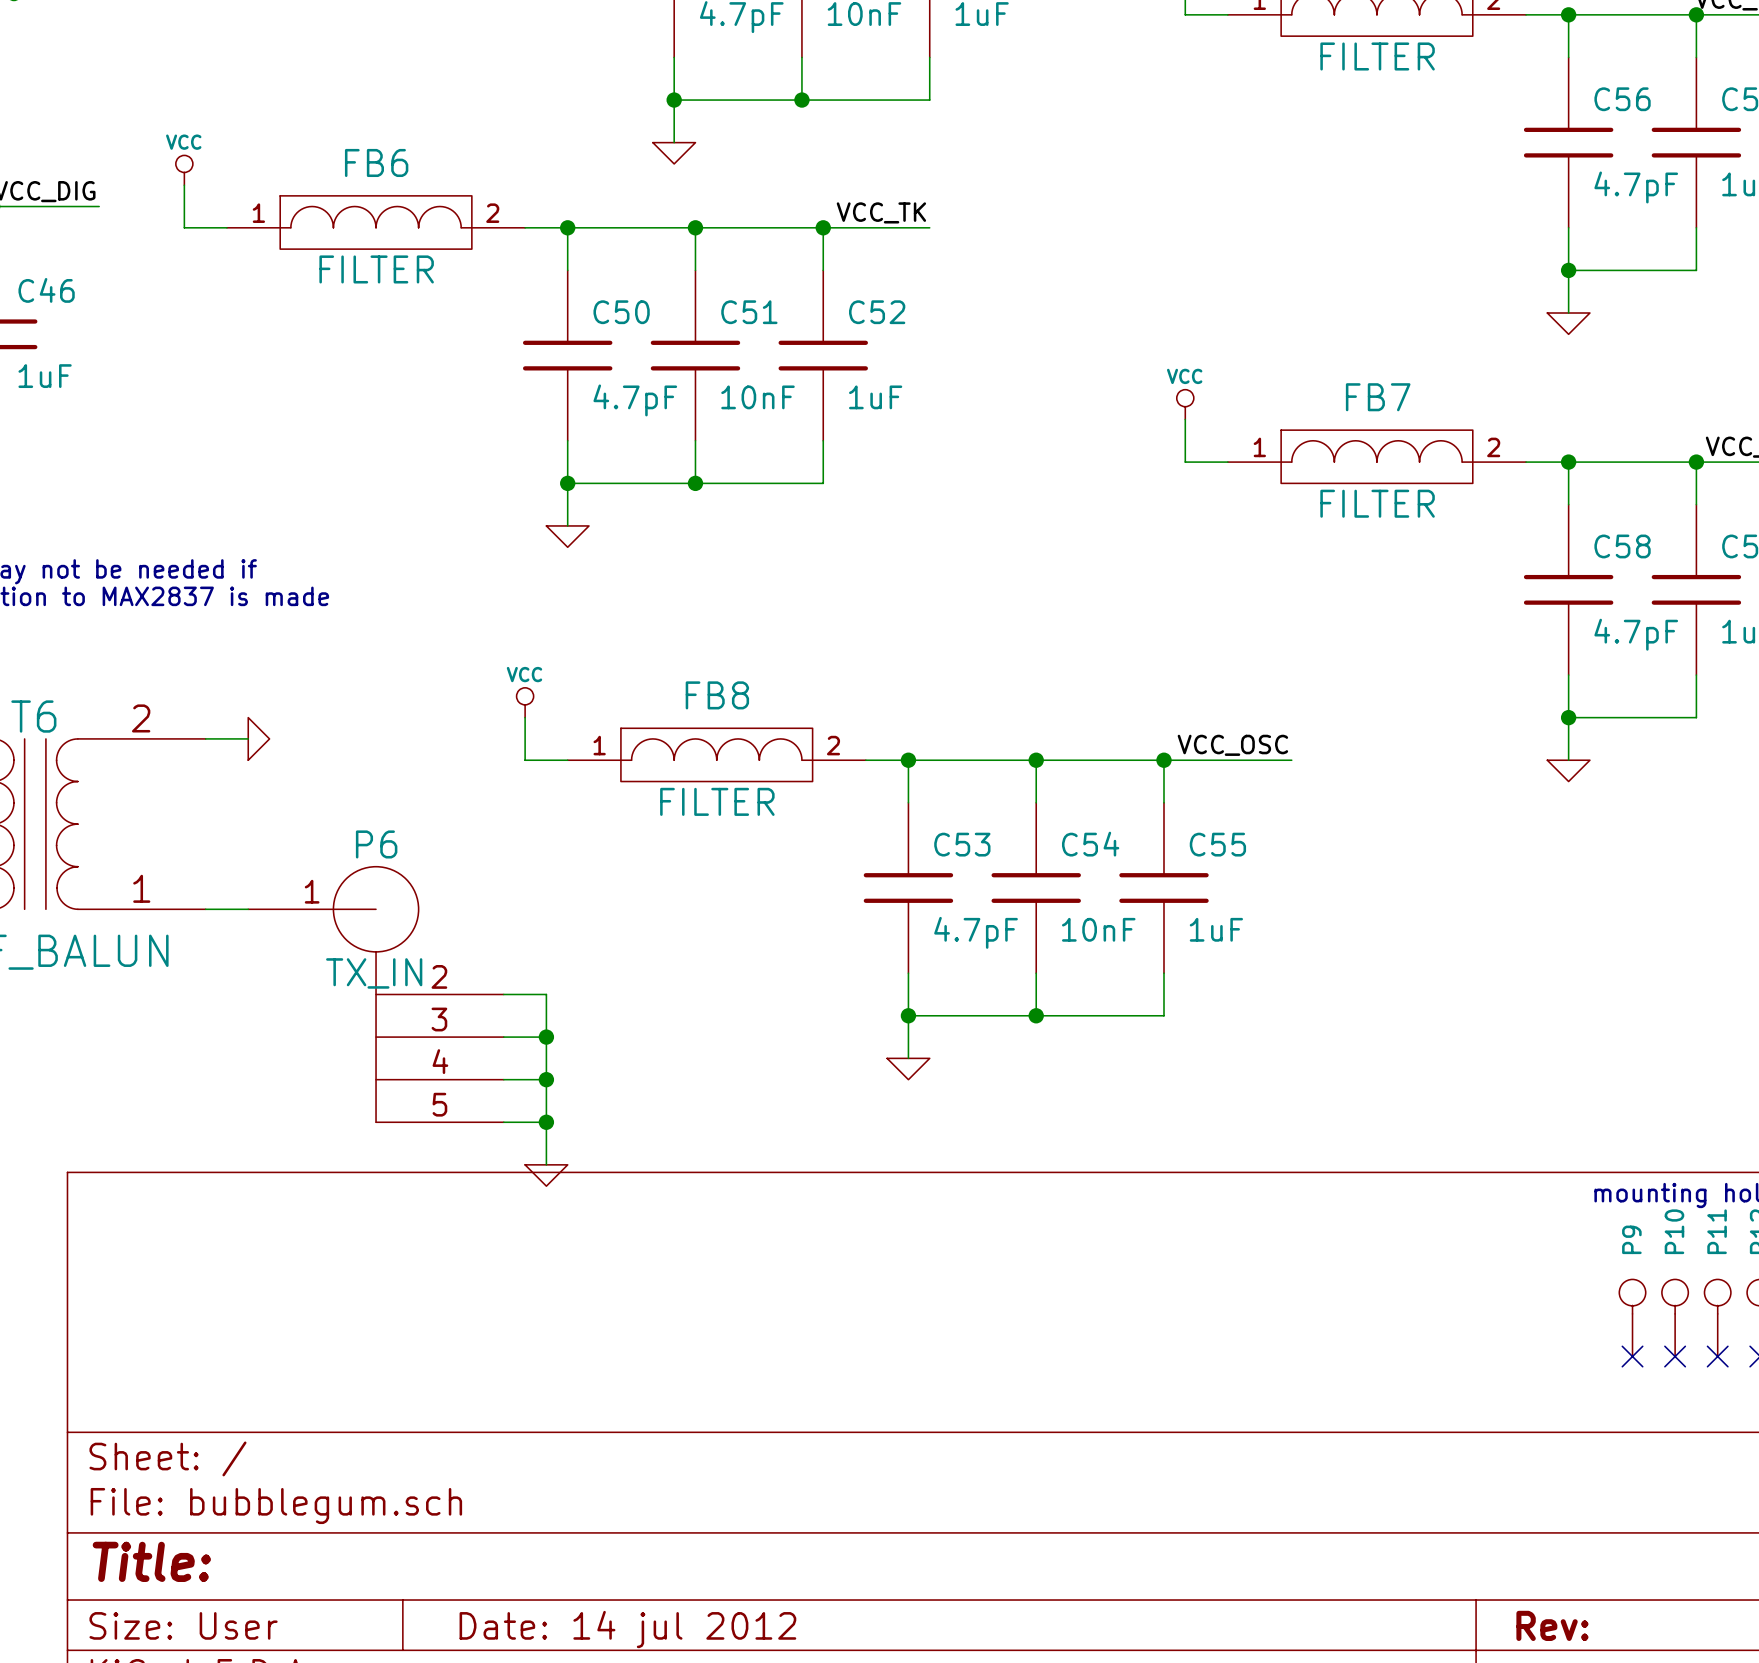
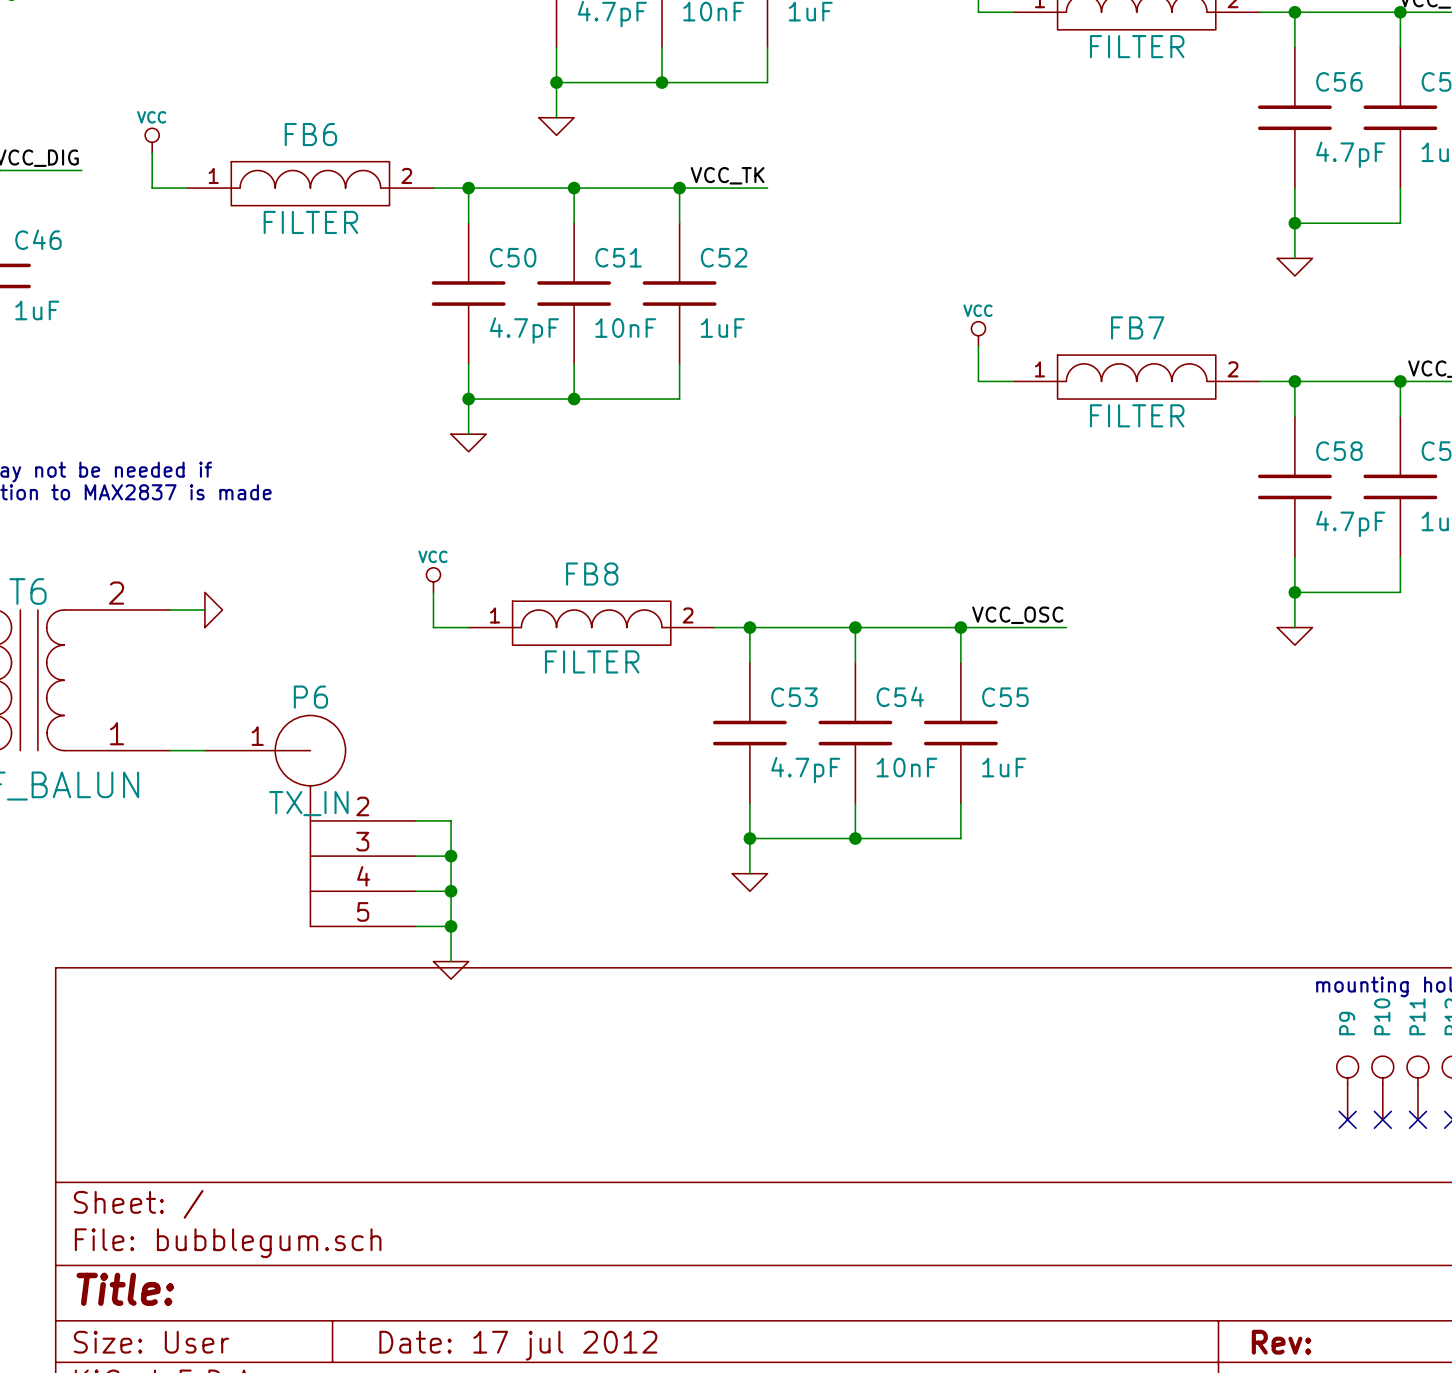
title block: Date: 14 jul 2012 (627, 1629) -> Date: 17 jul 2012 (518, 1345)

